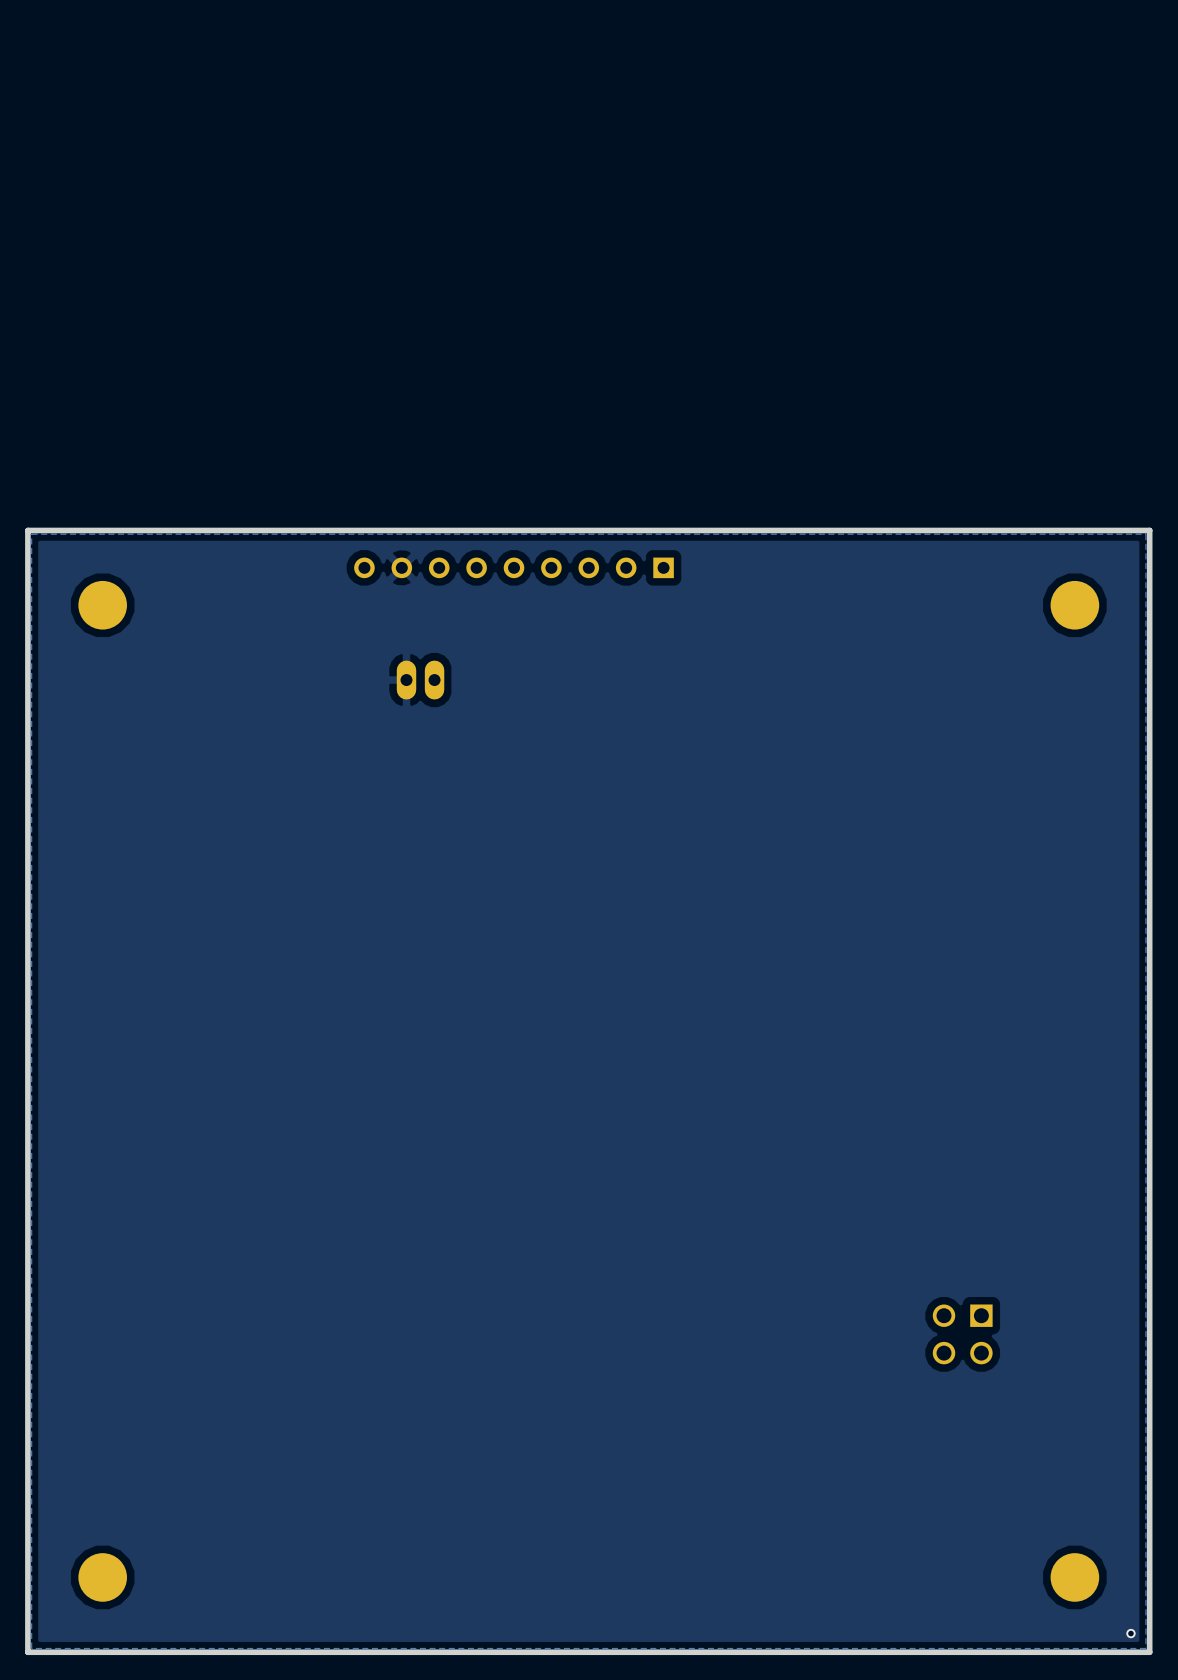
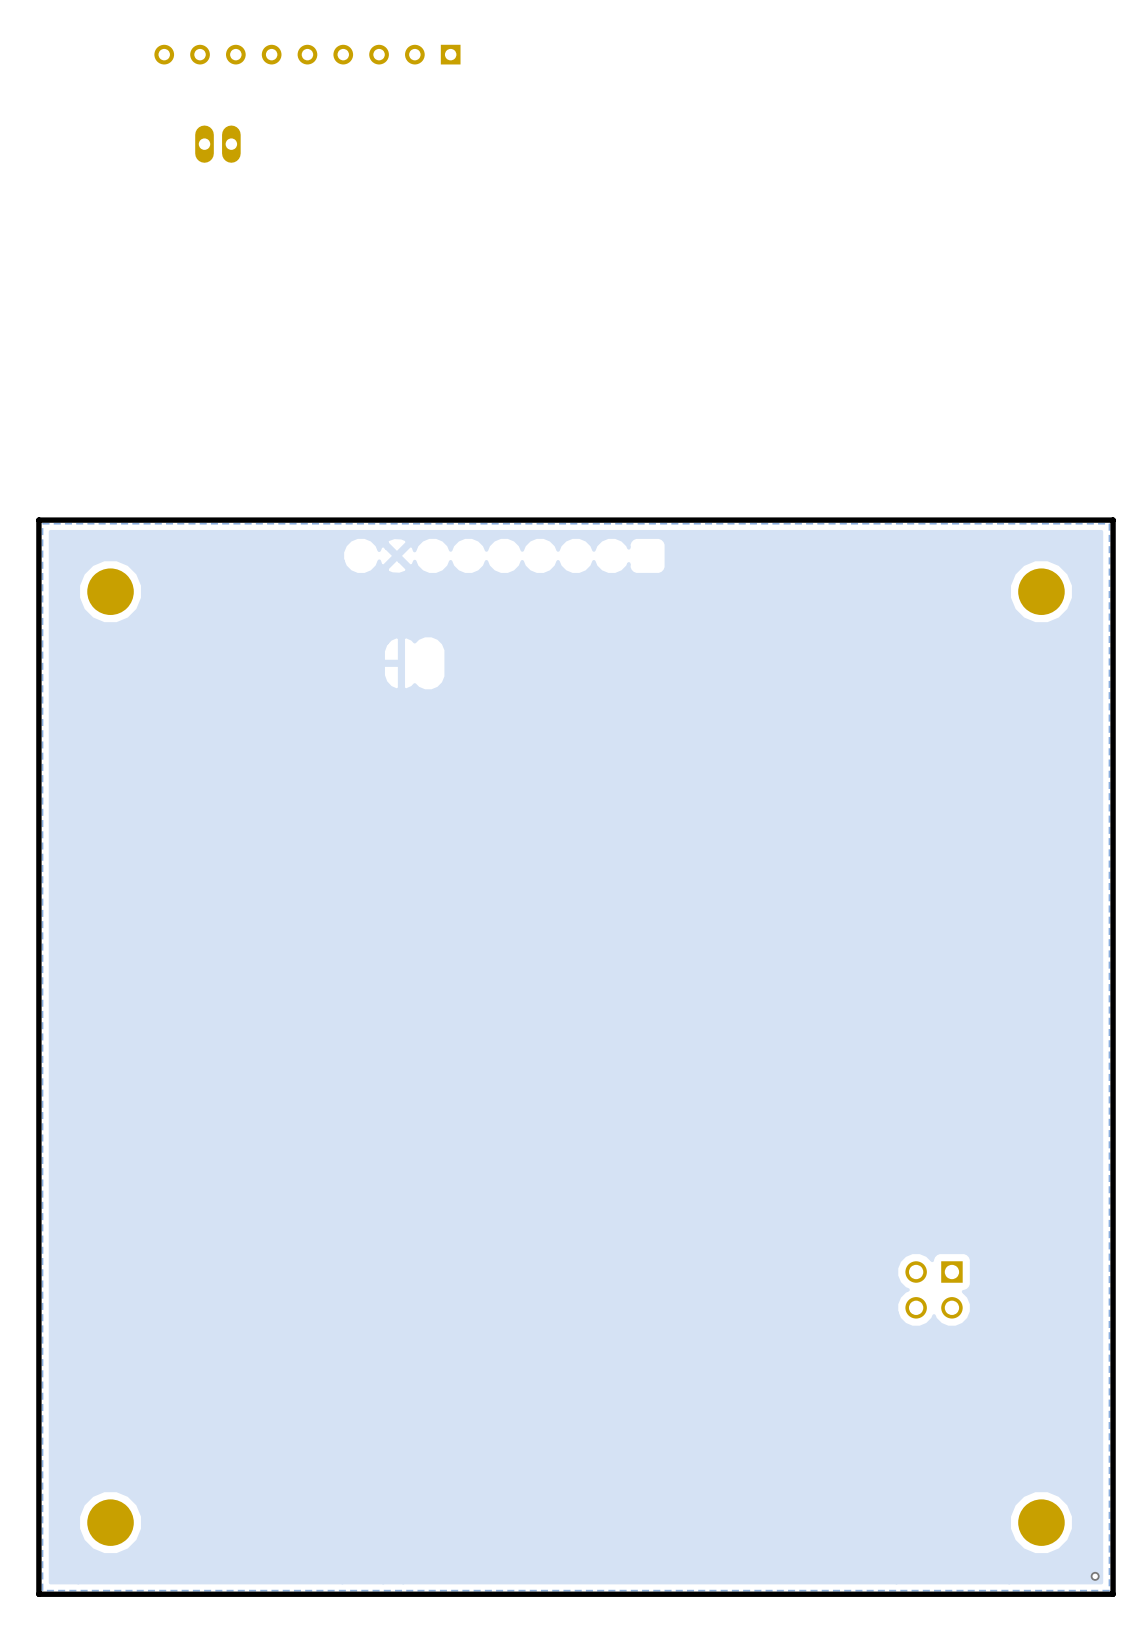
part: none -> (307, 54)
part: none -> (217, 144)
part: (514, 567) -> none
part: (420, 680) -> none

